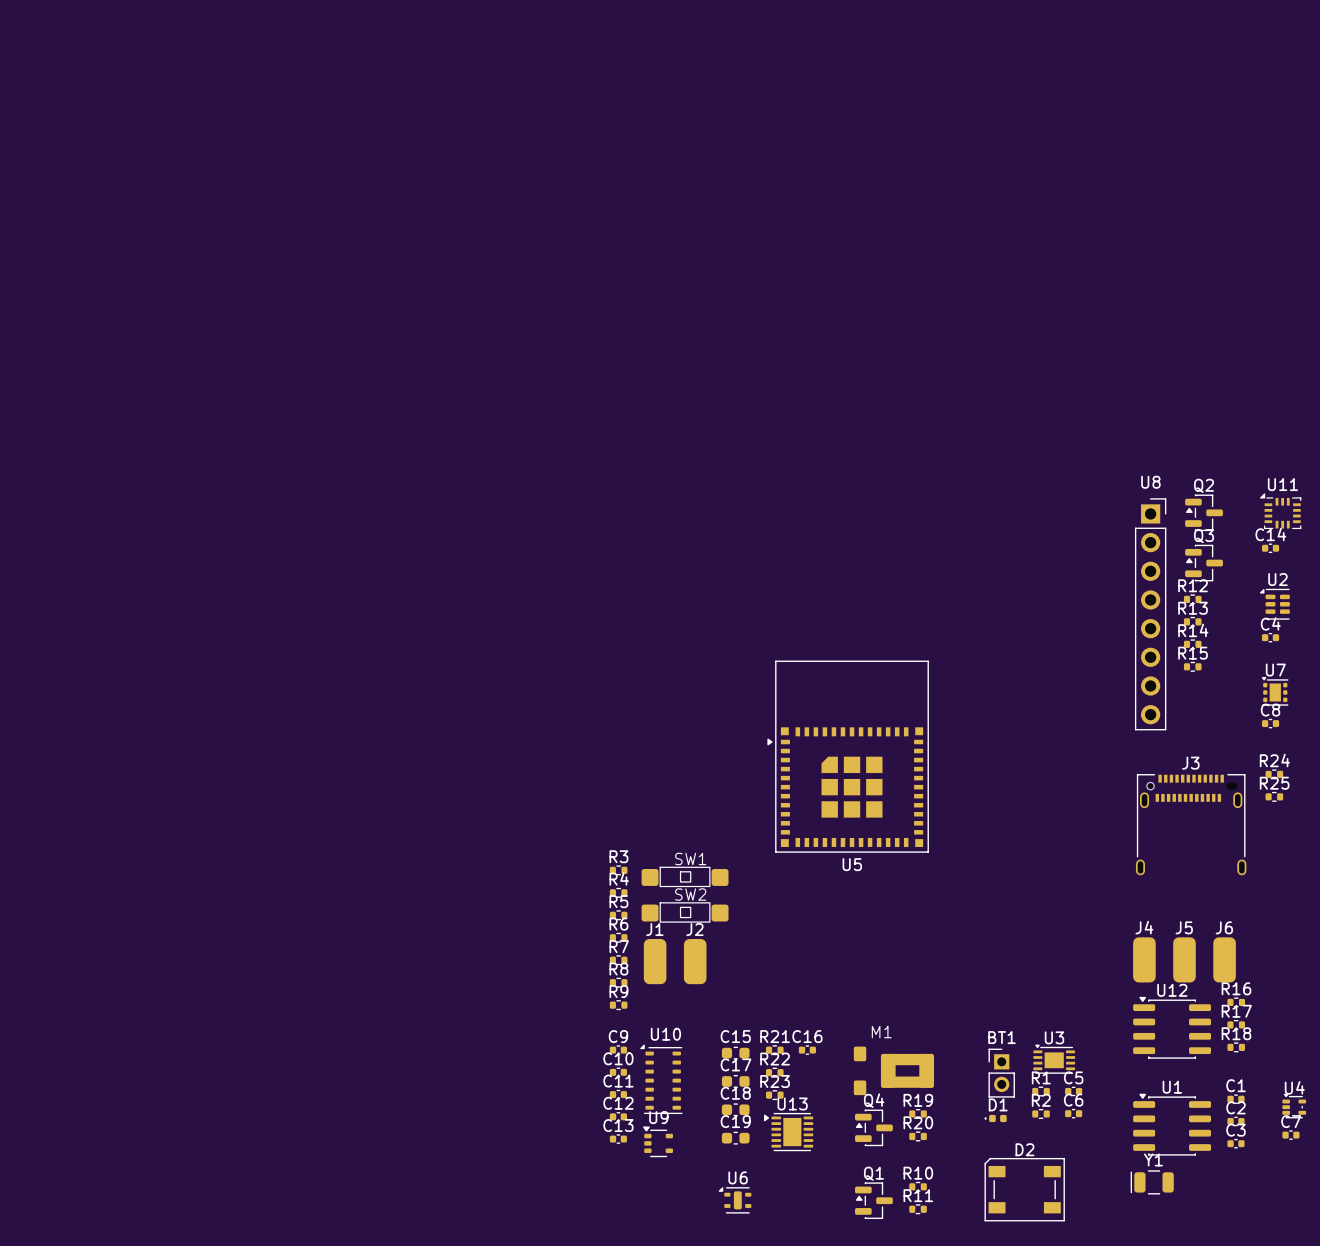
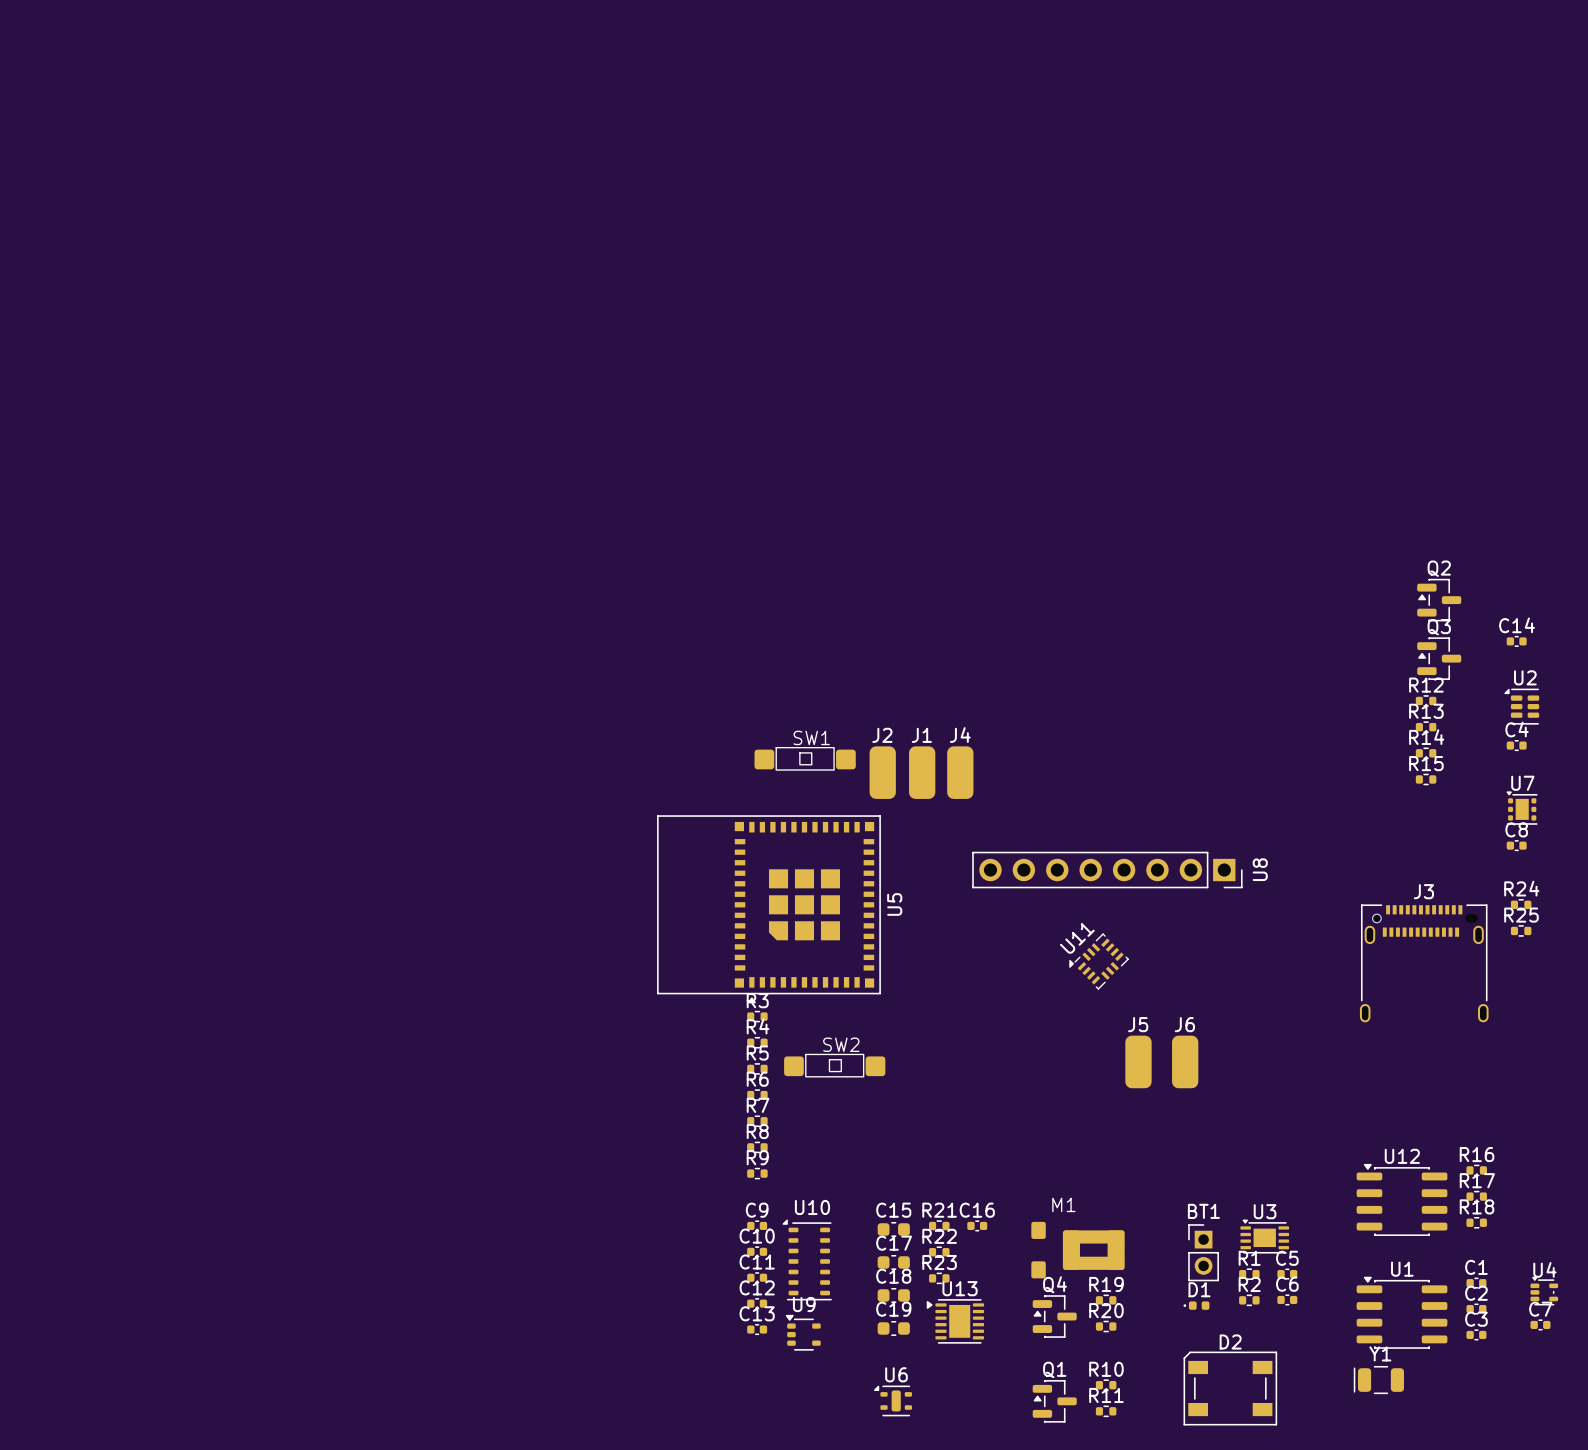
U11 rotation: 0° (1280, 511) -> 45° counterclockwise (1099, 961)
U11 position: (1280, 511) -> (1099, 961)
U8 rotation: 0° (1150, 614) -> 90° clockwise (1107, 870)
U8 position: (1150, 614) -> (1107, 870)
U5 rotation: 0° (848, 756) -> 90° counterclockwise (768, 909)
U5 position: (848, 756) -> (768, 909)
SW1 position: (685, 876) -> (805, 758)
J4 position: (1144, 959) -> (960, 772)
J5 position: (1184, 959) -> (1138, 1061)
J6 position: (1224, 959) -> (1185, 1061)
J1 position: (655, 961) -> (922, 772)
J2 position: (695, 961) -> (882, 772)

